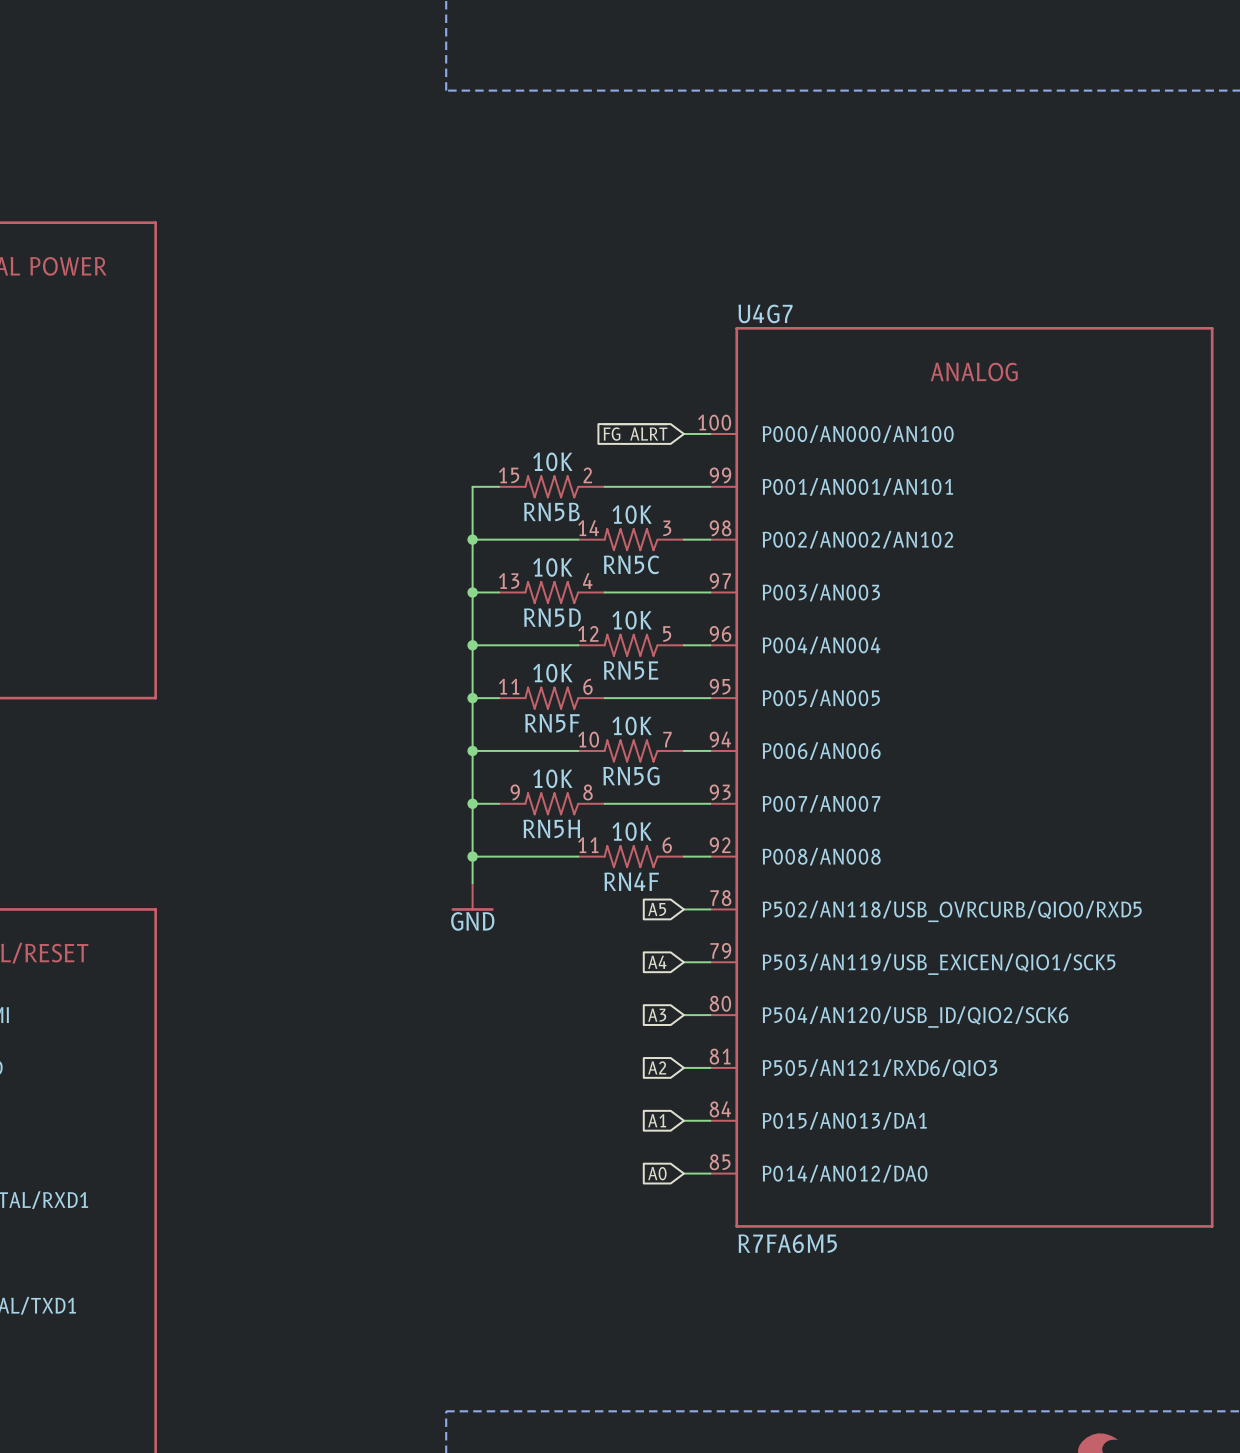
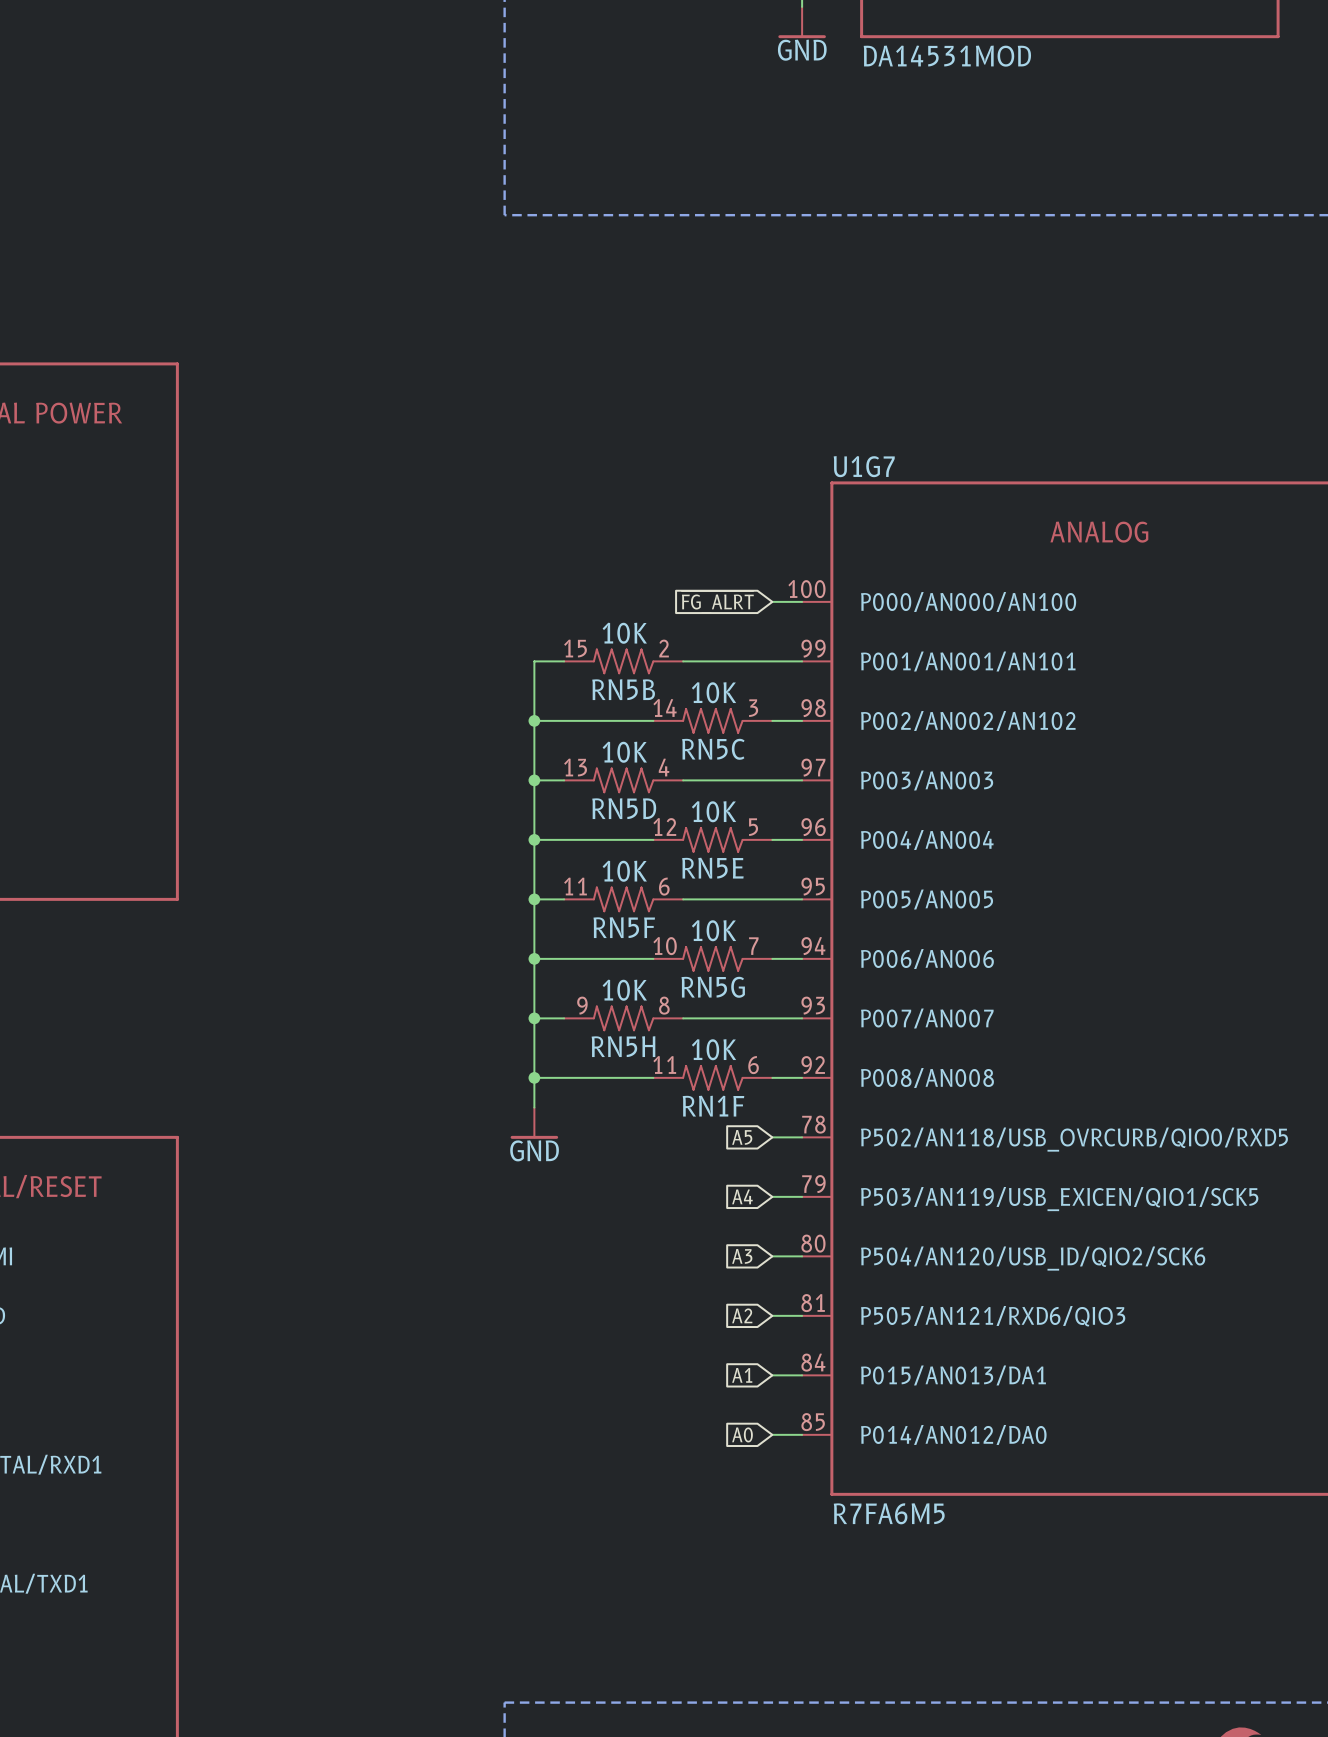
U4G7 name: U4G7 (765, 313) -> U1G7 (864, 466)
RN4F name: RN4F (631, 881) -> RN1F (713, 1106)

